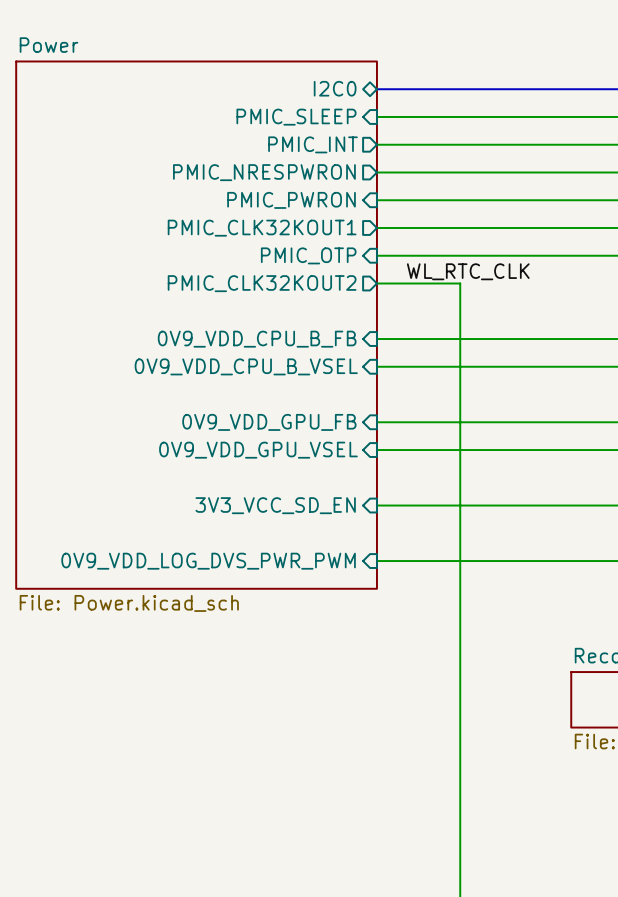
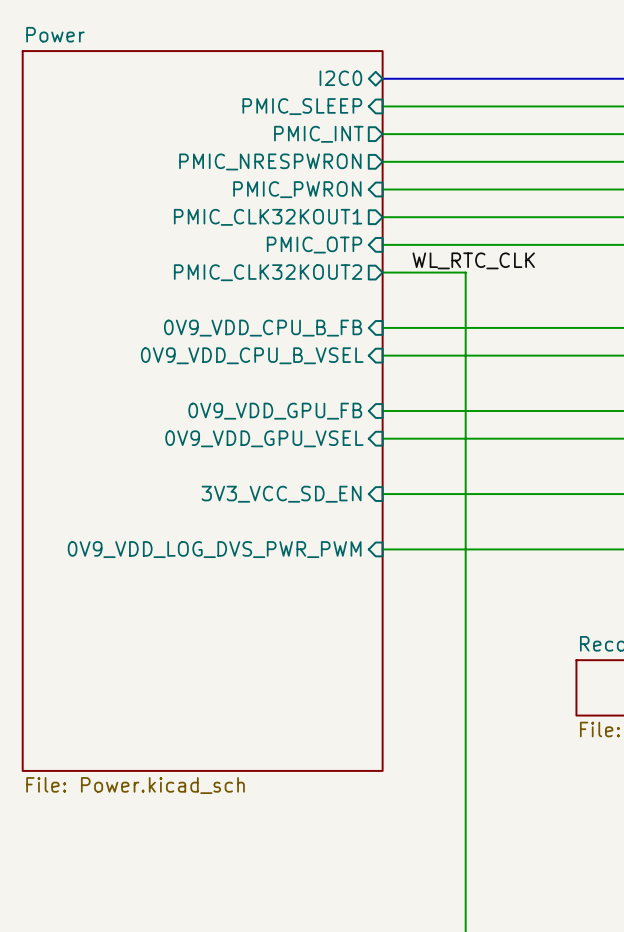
sheet Power: File: Power.kicad_sch (196, 325) -> none
sheet Power: none -> File: Power.kicad_sch (202, 411)

